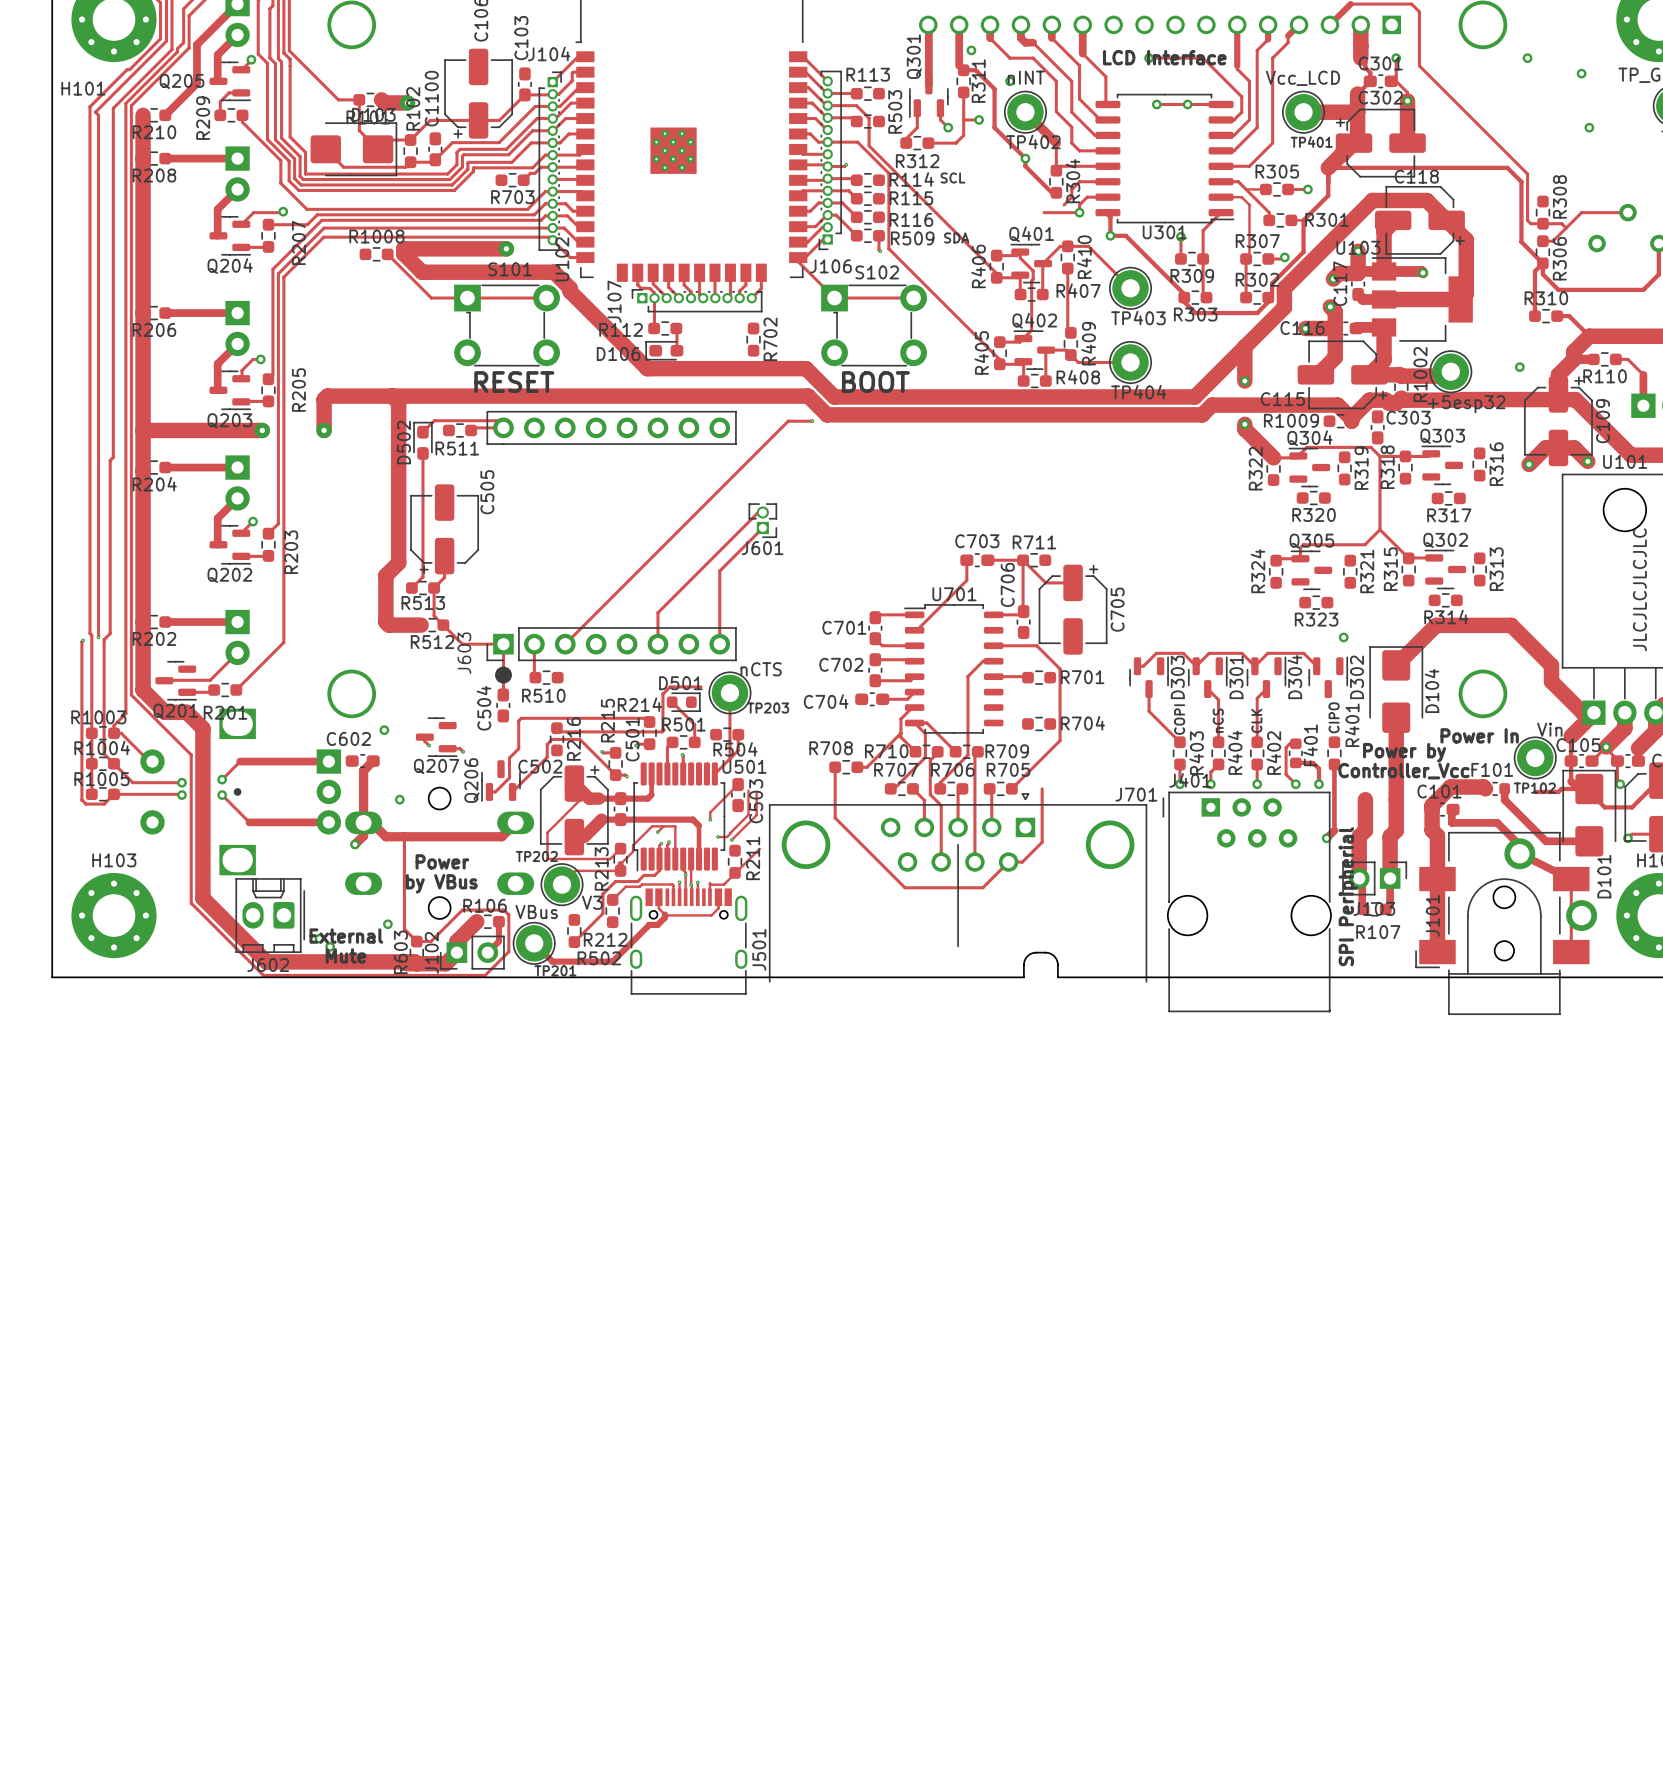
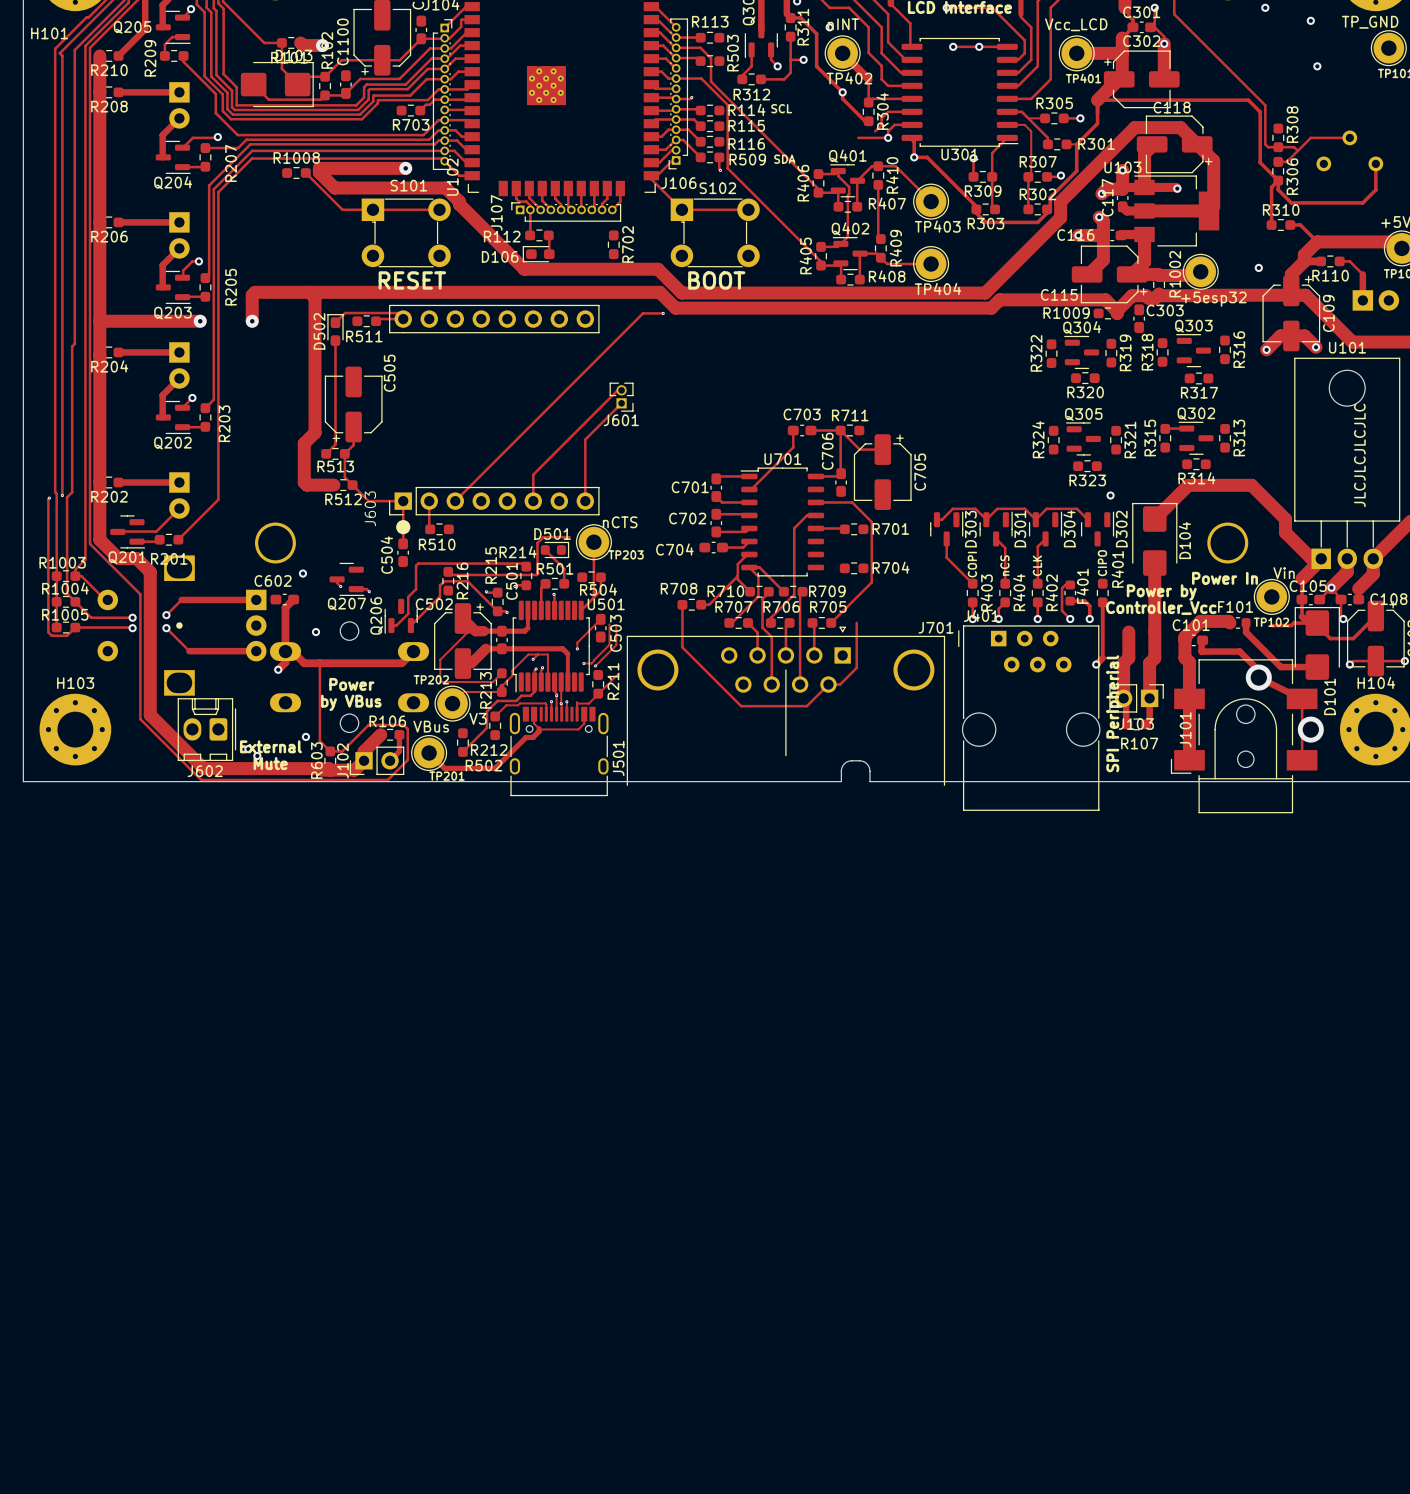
track: (1244, 347) (1244, 381) -> none
via: (1244, 381) -> none
track: (1244, 424) (1244, 429) (1273, 457) (1296, 457) (1306, 447) (1370, 447) (1380, 456) -> none
via: (1244, 424) -> none
track: (1431, 453) (1428, 456) (1380, 456) -> none
track: (1380, 456) (1380, 529) -> none
track: (1380, 529) (1364, 544) (1303, 544) (1300, 547) (1300, 558) (1278, 558) (1276, 560) -> none
track: (1380, 529) (1408, 558) -> none

